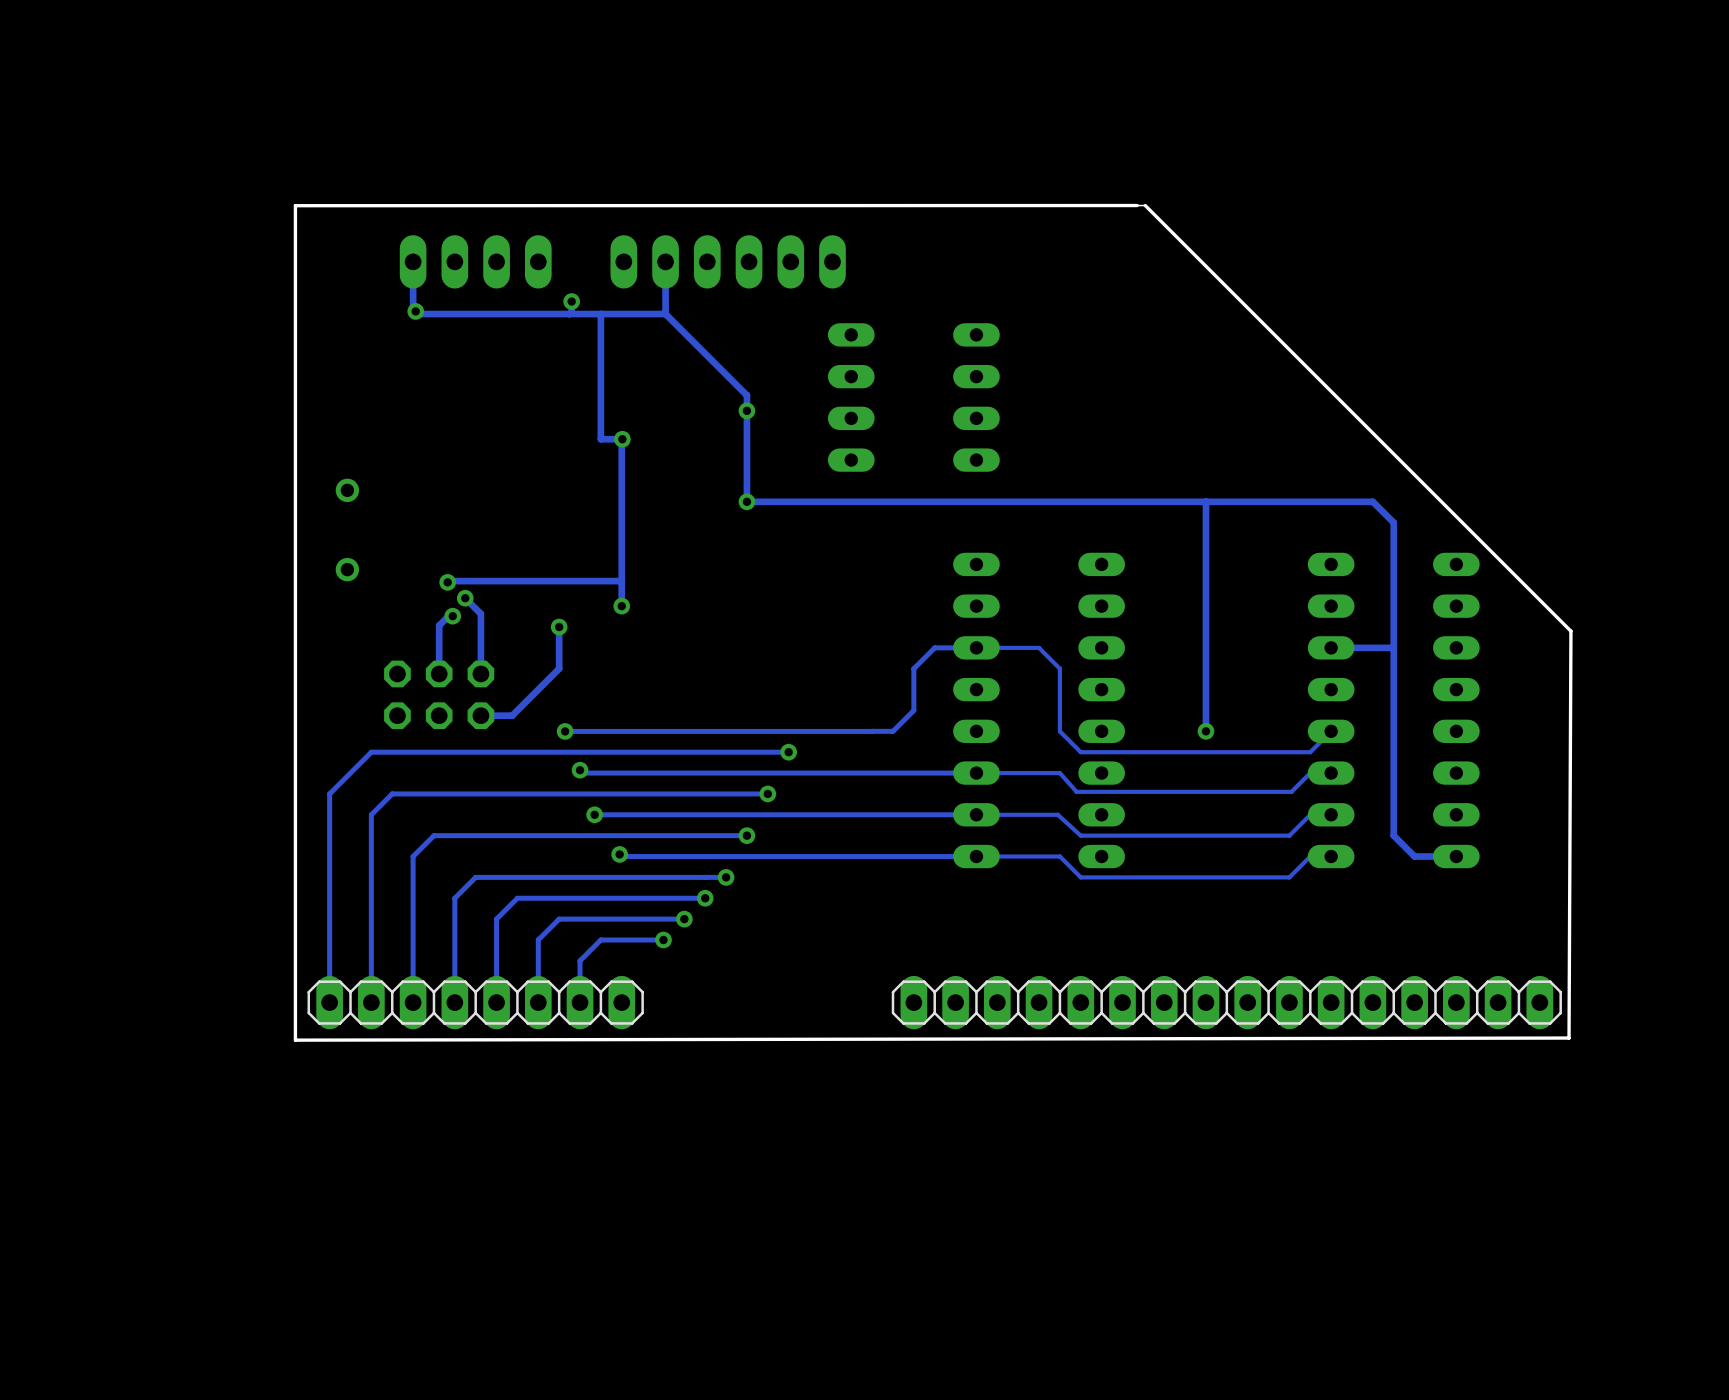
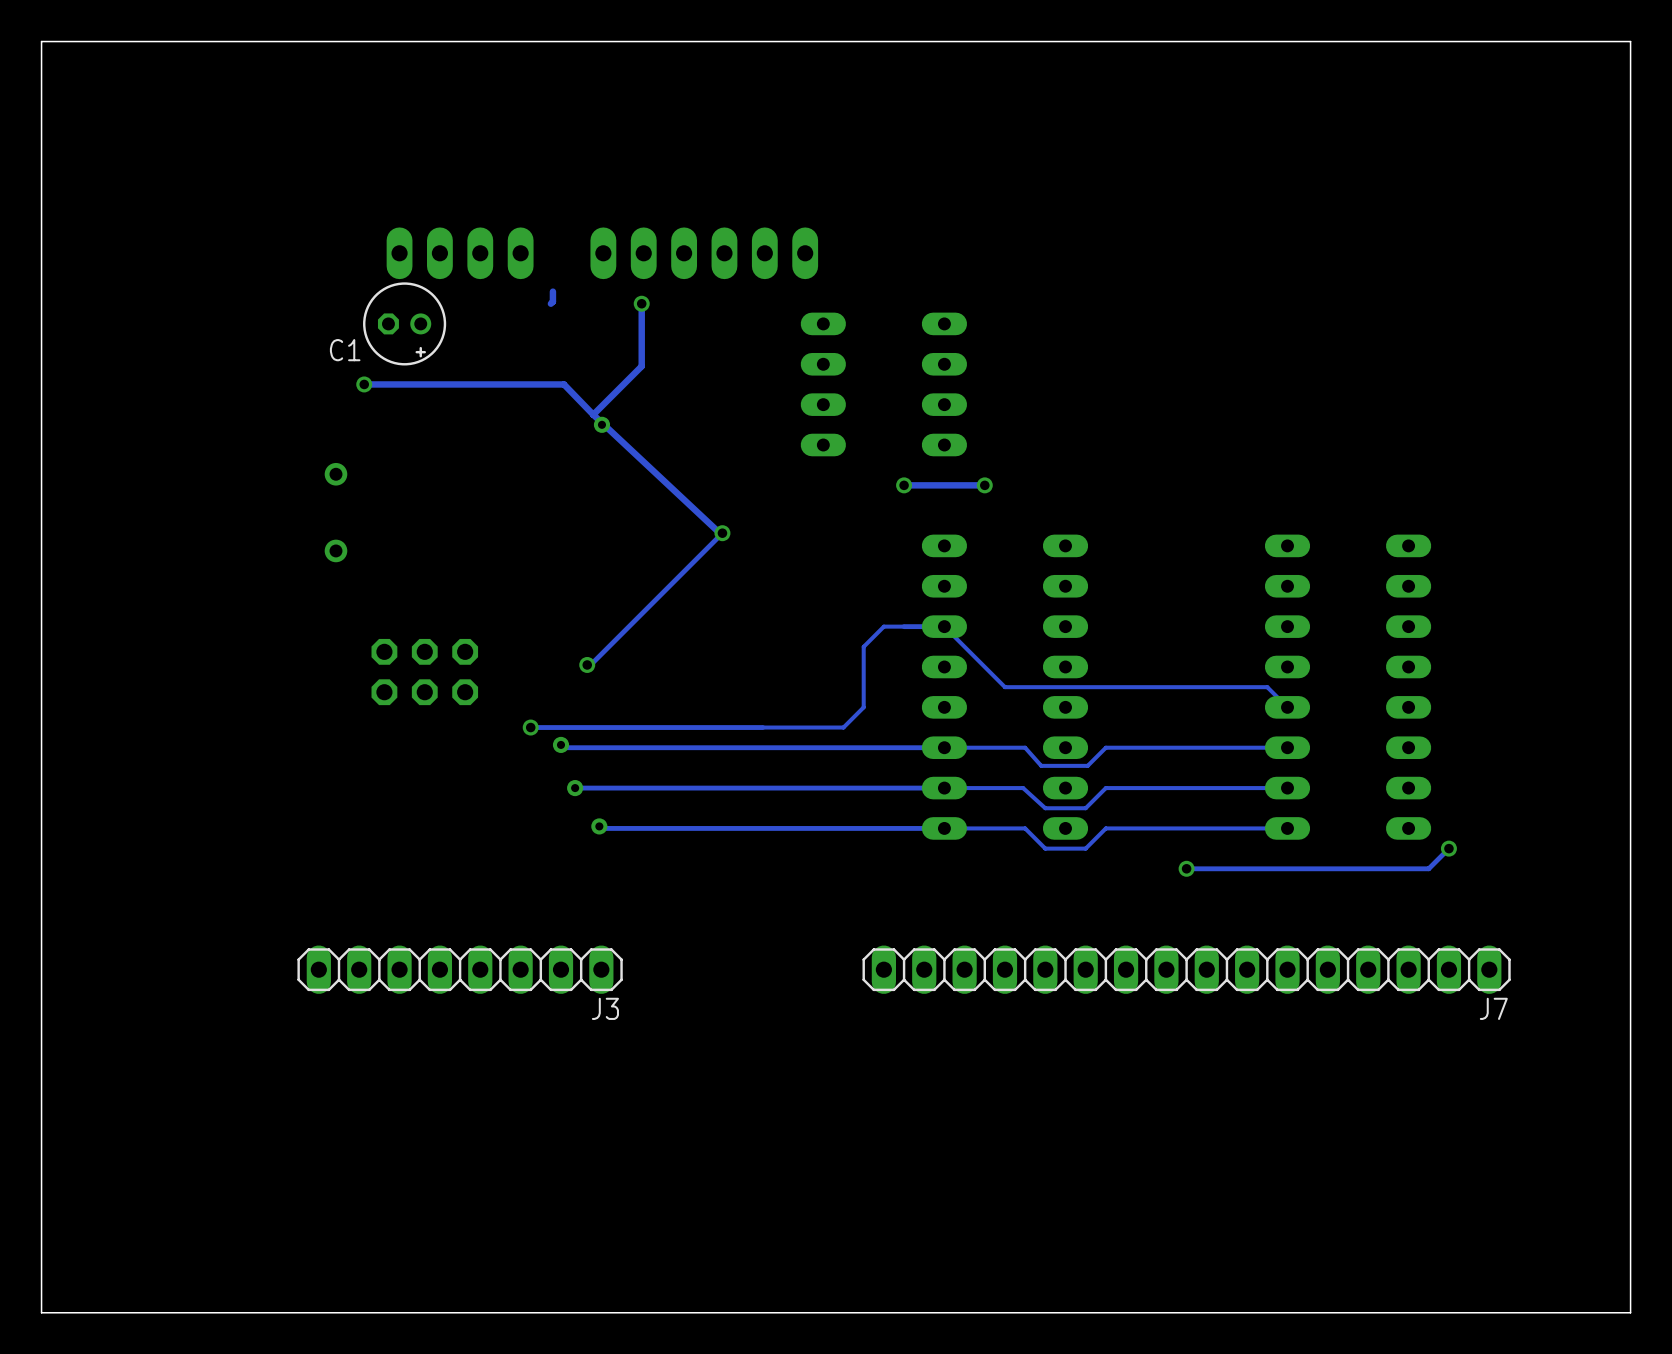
board edge: none -> (1630, 41) (41, 41) (41, 1312) (1630, 1312) (1630, 41)
board edge: (1145, 205) (1570, 631) (1569, 1038) (295, 1040) (295, 205) (1145, 205) -> none
track: (413, 261) (413, 308) (418, 314) (665, 314) -> none
track: (665, 261) (665, 314) -> none
via: (571, 301) -> none
via: (415, 311) -> none
track: (600, 314) (600, 439) (622, 439) -> none
track: none -> (641, 303) (641, 366) (593, 414)
via: none -> (641, 303)
track: (665, 314) (746, 395) (746, 501) (934, 501) -> none
C1: none -> (404, 323)
track: none -> (364, 384) (564, 384) (593, 414)
via: none -> (364, 384)
via: (746, 410) -> none
track: none -> (593, 414) (719, 533) (722, 533) (590, 664) (587, 664)
track: (621, 439) (621, 606) -> none
via: (746, 501) -> none
via: none -> (904, 485)
track: (1018, 501) (1372, 501) (1393, 522) (1393, 835) (1414, 856) (1456, 856) -> none
via: none -> (984, 485)
track: (1205, 501) (1205, 731) -> none
via: none -> (722, 533)
track: (621, 581) (447, 582) -> none
via: (447, 582) -> none
track: (465, 598) (480, 613) (480, 673) -> none
via: (465, 598) -> none
via: (621, 606) -> none
track: (452, 616) (448, 616) (439, 625) (439, 673) -> none
via: (452, 616) -> none
track: (559, 627) (559, 668) (512, 715) (480, 715) -> none
via: (559, 627) -> none
track: (934, 647) (913, 668) (913, 710) (893, 731) (872, 731) -> (904, 626) (883, 626) (863, 646) (863, 707) (843, 727) (762, 727)
track: (976, 647) (1039, 647) (1059, 668) (1059, 731) (1080, 752) (1310, 752) (1331, 731) -> (944, 626) (1004, 687) (1267, 687) (1287, 707)
track: (1393, 647) (1331, 647) -> none
via: none -> (587, 664)
via: (565, 731) -> none
track: (872, 731) (565, 731) -> none
via: (1205, 731) -> none
track: (548, 752) (371, 752) (329, 793) (329, 1002) -> none
via: none -> (530, 727)
via: (788, 752) -> none
track: (1310, 773) (1291, 791) (1124, 791) -> (1267, 747) (1105, 747) (1087, 765)
track: (767, 793) (392, 793) (371, 814) (371, 1002) -> none
via: (767, 793) -> none
track: (1310, 814) (1289, 835) (1122, 835) -> (1267, 788) (1105, 788) (1085, 808)
track: (746, 835) (433, 835) (413, 856) (413, 1002) -> none
via: (746, 835) -> none
track: (1310, 856) (1289, 877) (1122, 877) -> (1267, 828) (1105, 828) (1085, 848)
track: (726, 877) (475, 877) (454, 898) (454, 1002) -> none
via: (726, 877) -> none
track: none -> (1448, 848) (1428, 868) (1186, 868)
via: none -> (1448, 848)
track: (705, 898) (517, 898) (496, 919) (496, 1002) -> none
via: (705, 898) -> none
via: none -> (1186, 868)
track: (684, 919) (559, 919) (538, 939) (538, 1002) -> none
via: (684, 919) -> none
track: (663, 939) (600, 939) (580, 960) (580, 1002) -> none
via: (663, 939) -> none
part: (475, 1002) -> none
J3: none -> (460, 969)
part: (1226, 1002) -> none
J7: none -> (1186, 969)

